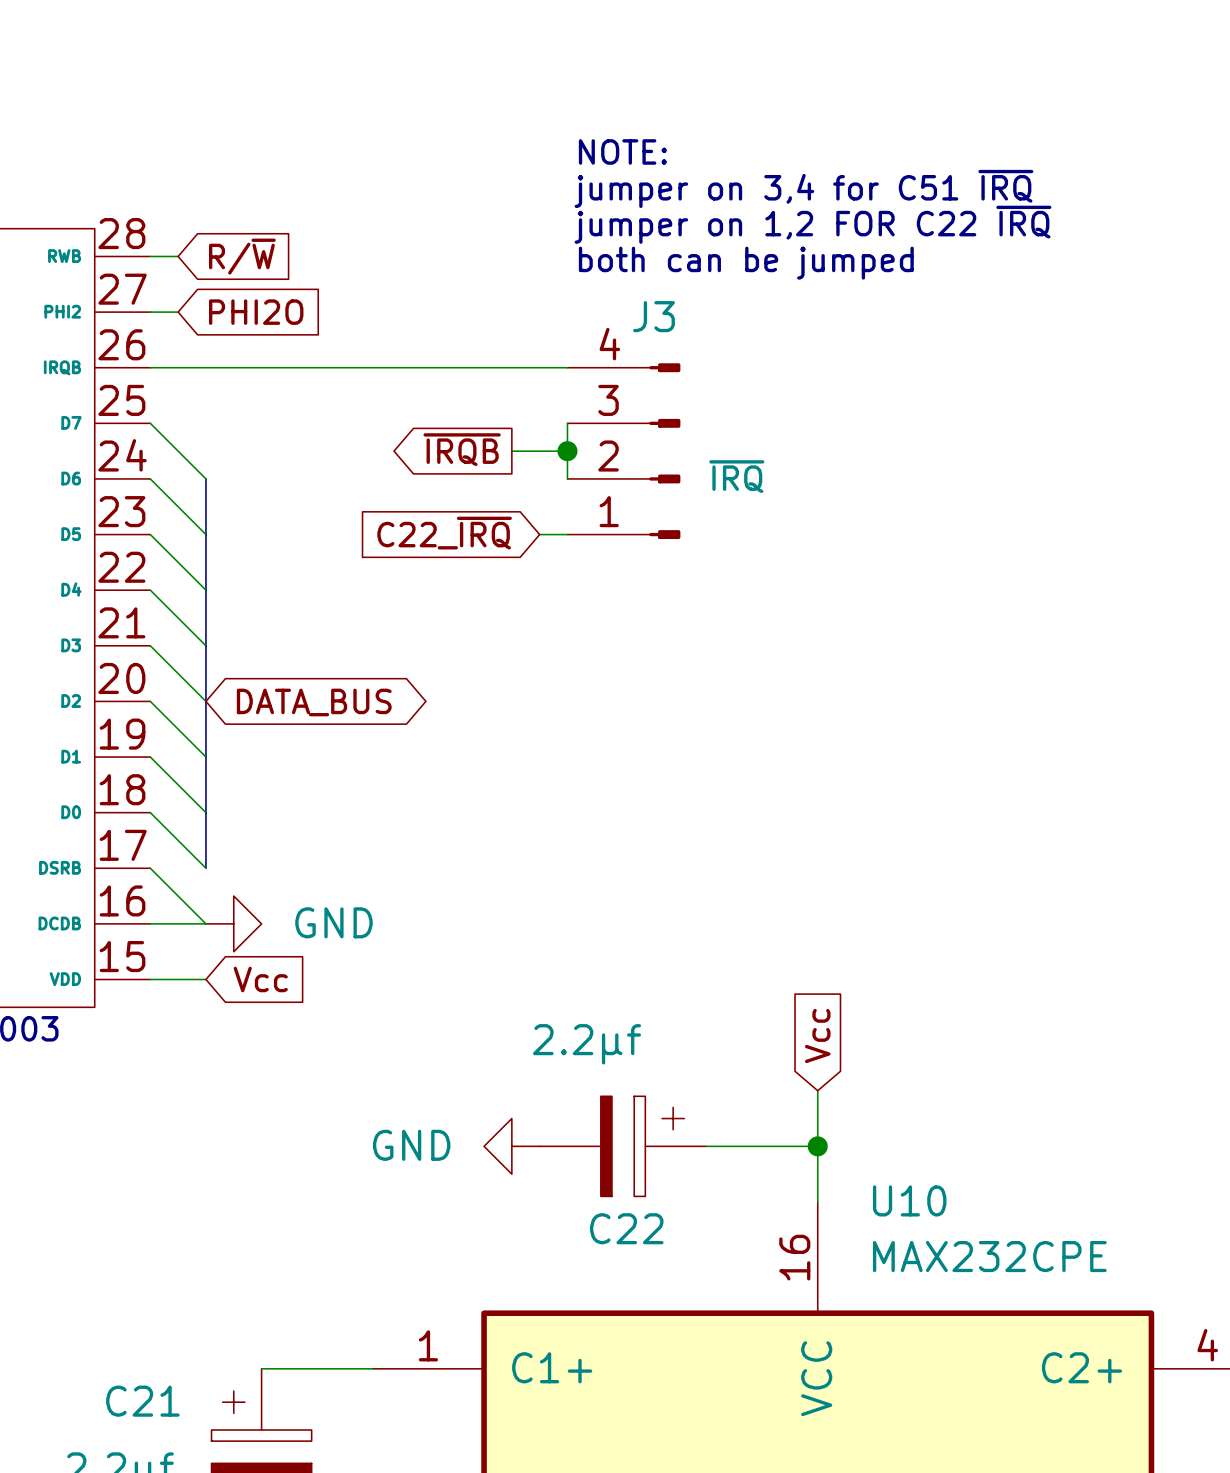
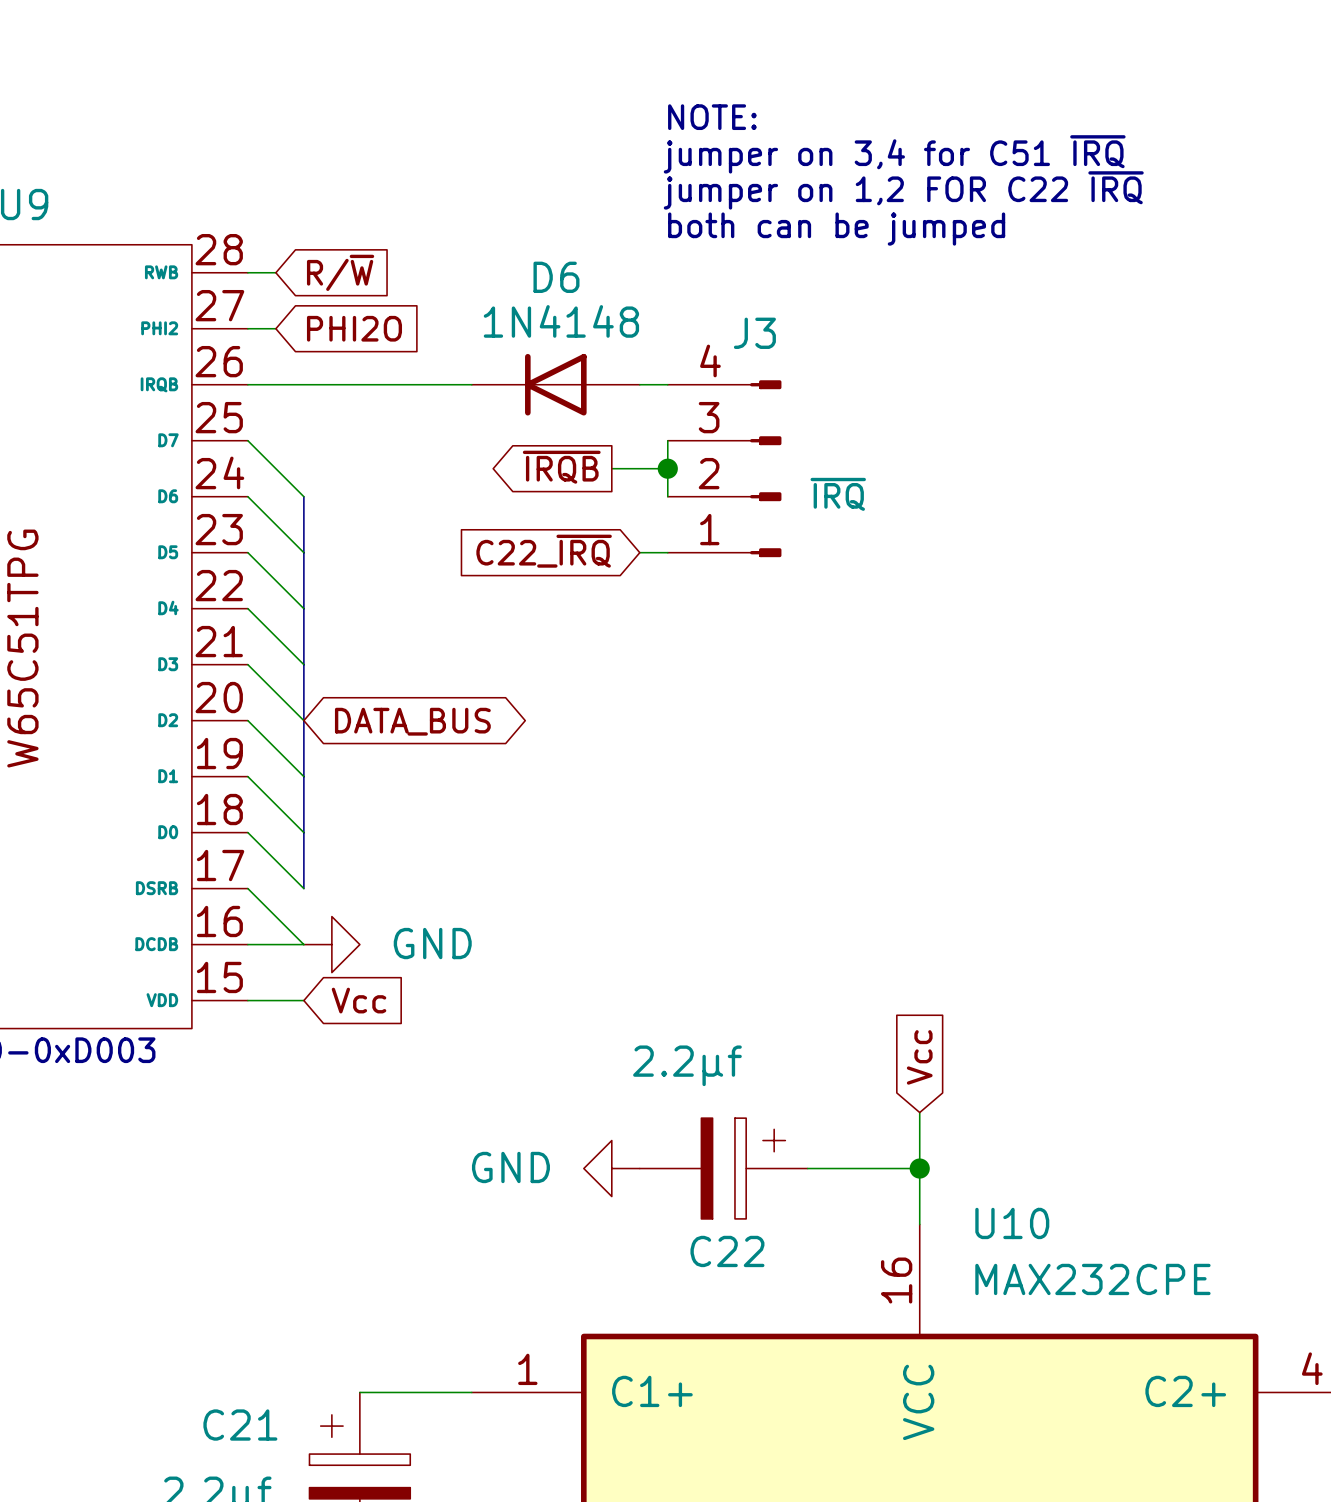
text position: NOTE: (622, 151) -> NOTE: (712, 117)
text position: jumper on 3,4 for C51 ~{IRQ} (804, 188) -> jumper on 3,4 for C51 ~{IRQ} (894, 154)
text position: jumper on 1,2 FOR C22 ~{IRQ} (813, 224) -> jumper on 1,2 FOR C22 ~{IRQ} (903, 190)
text position: both can be jumped (746, 263) -> both can be jumped (836, 229)
D6: none -> 1N4148 (555, 384)

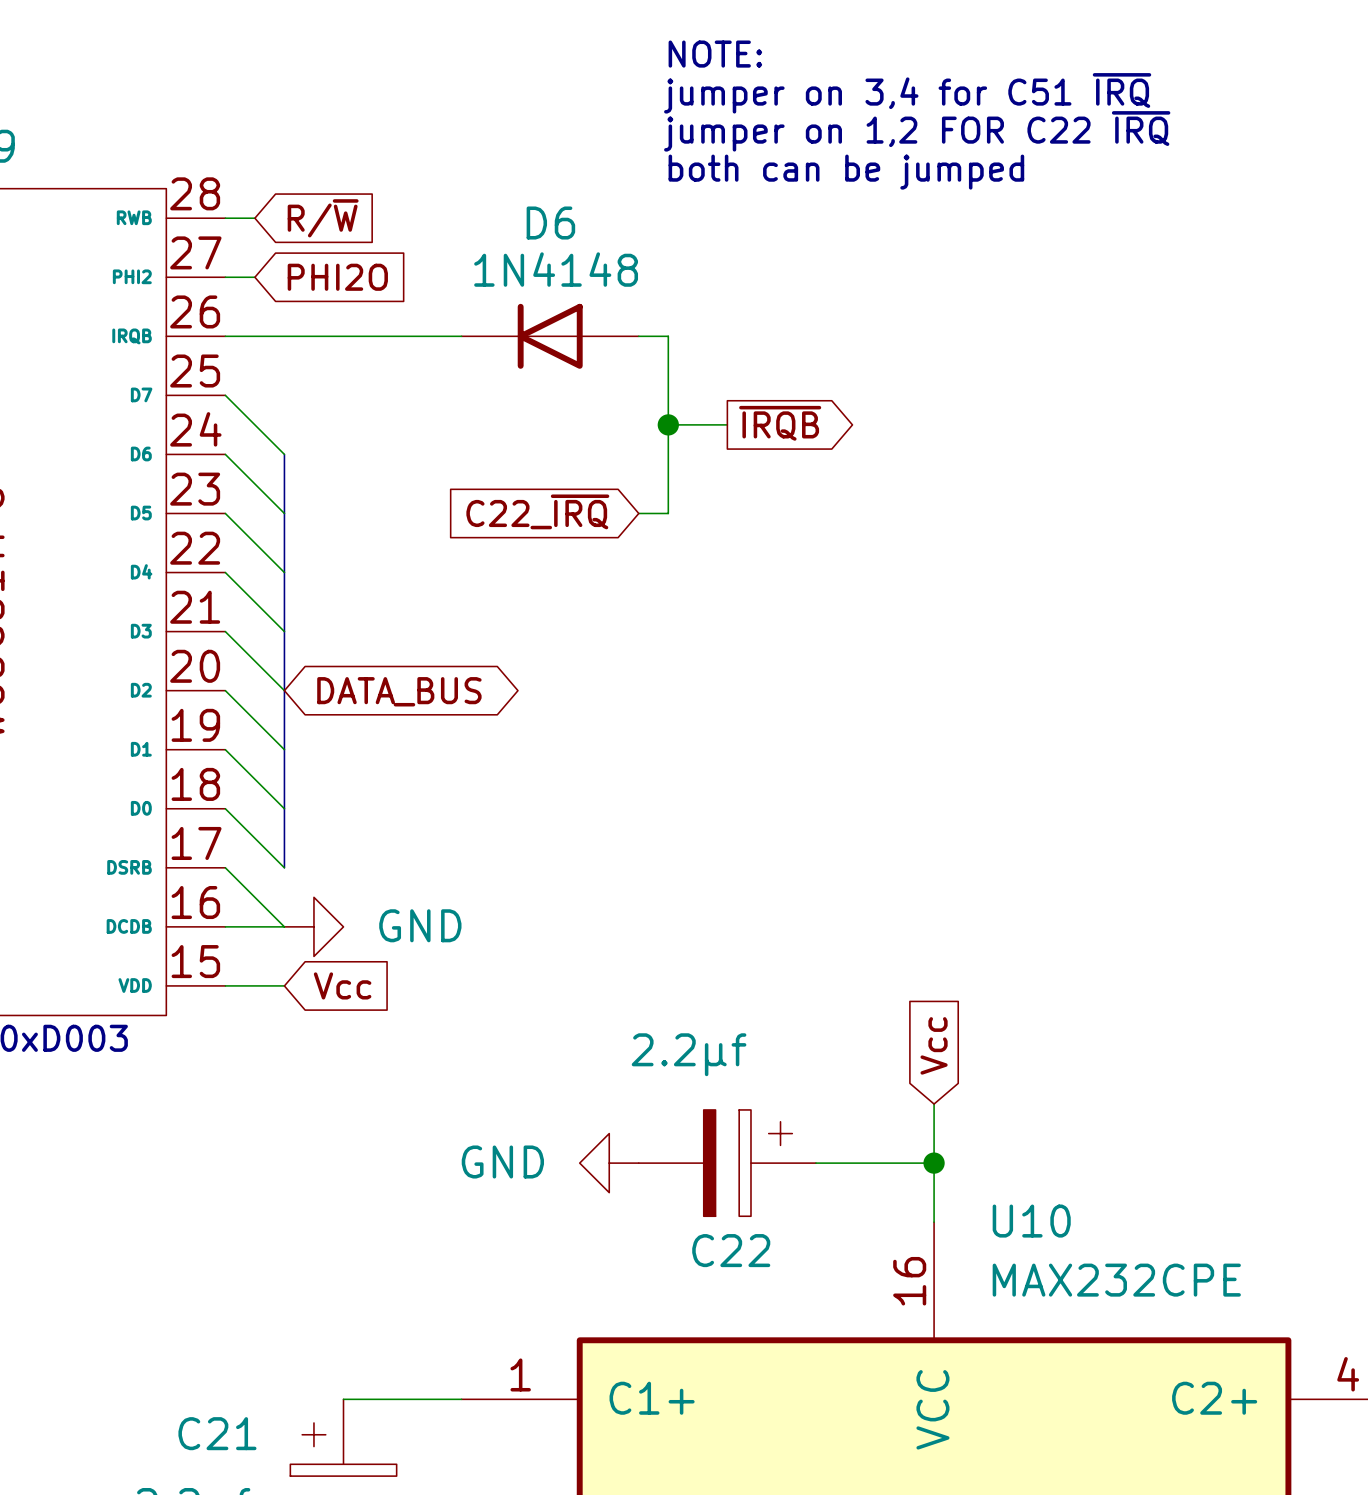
wire: none -> (668, 336) (668, 395)
global label rotation: 0° (561, 467) -> 180° (780, 423)
global label position: ~{IRQB} (561, 467) -> ~{IRQB} (780, 423)
wire: (611, 468) (667, 468) -> (727, 424) (668, 424)
J3: ~{IRQ} (724, 468) -> none
wire: none -> (668, 454) (668, 513)

